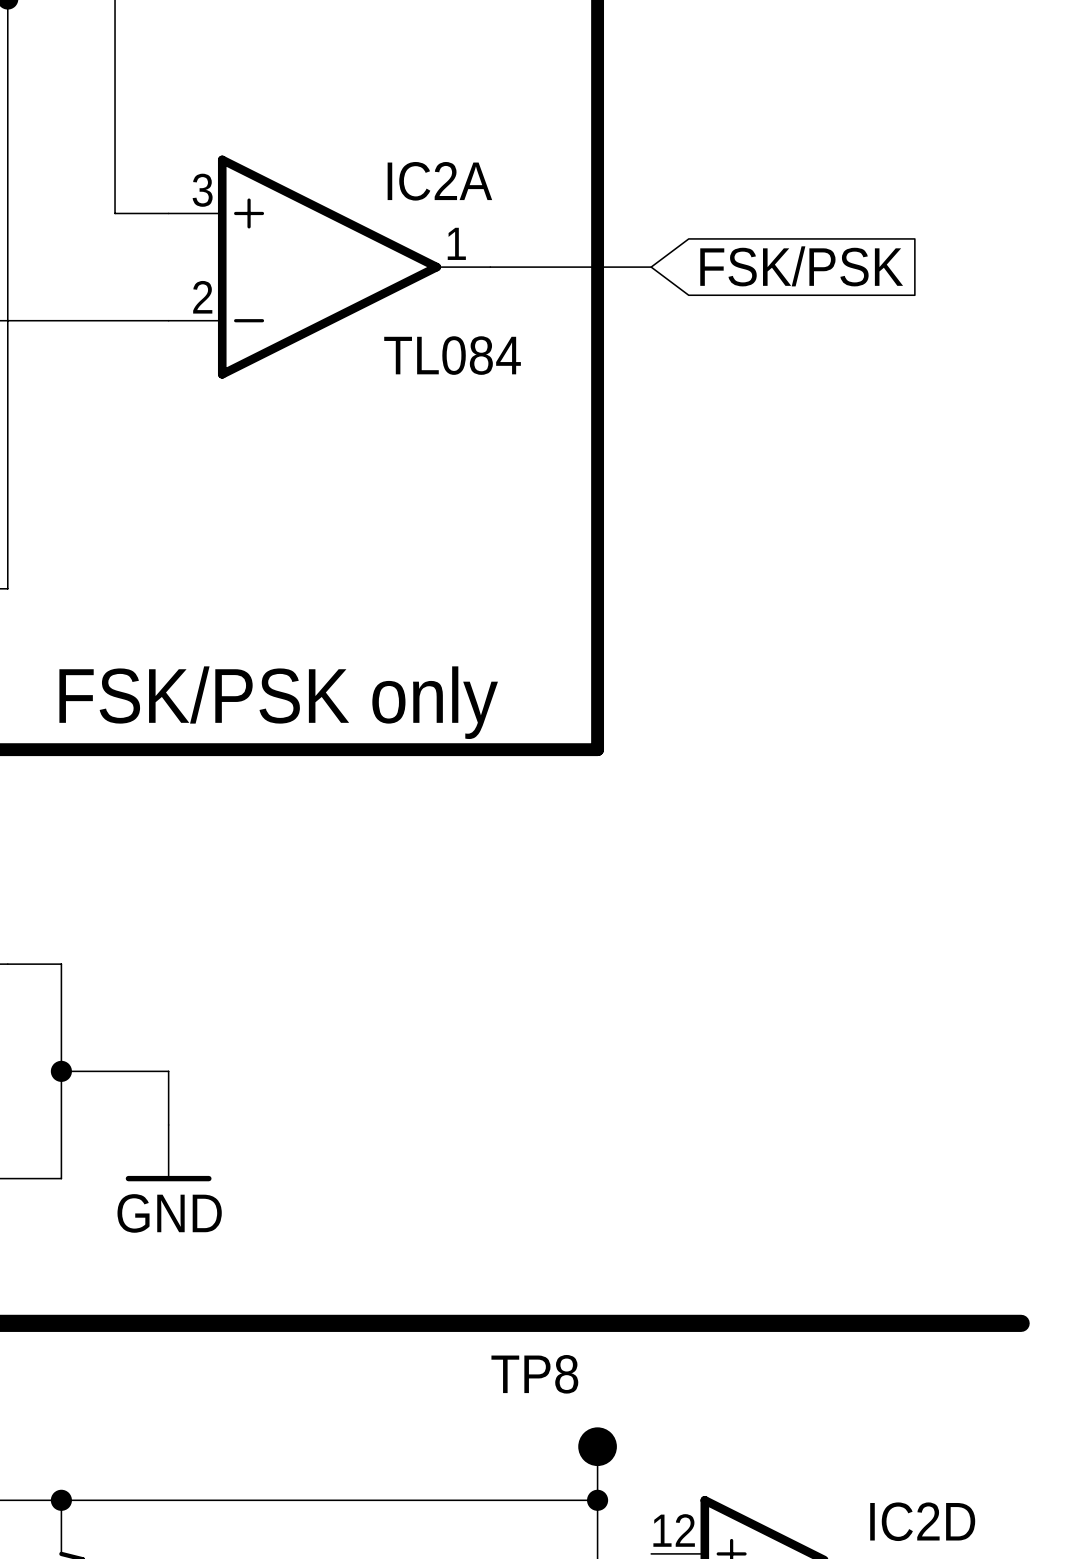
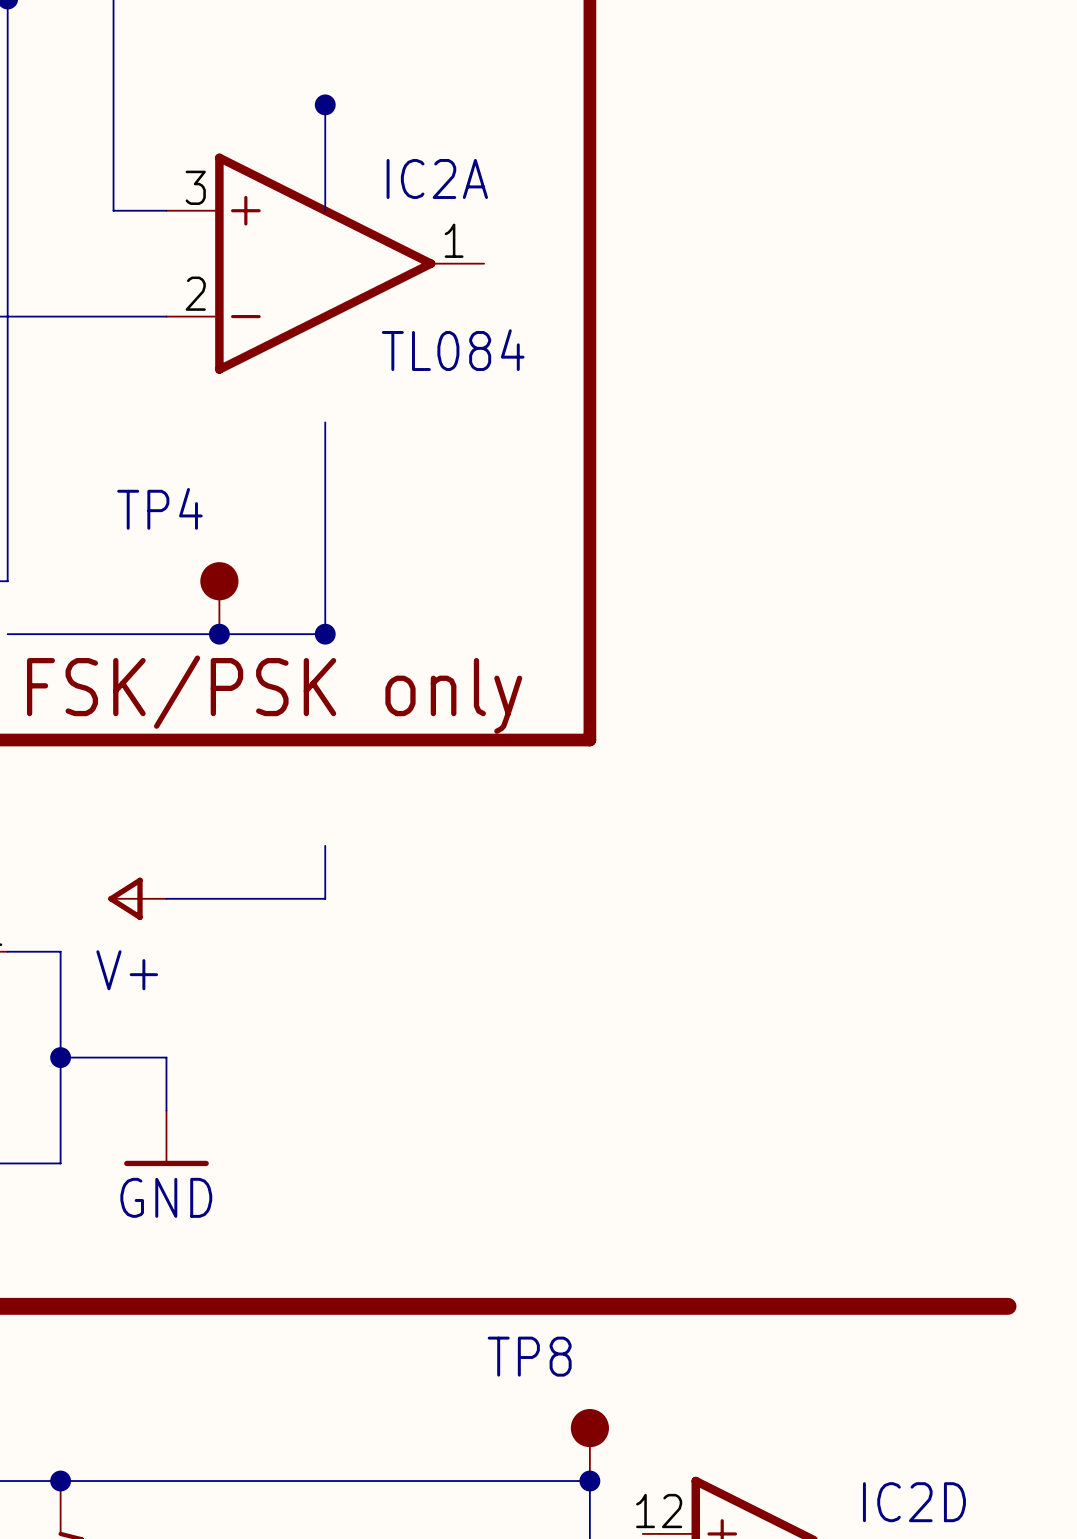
wire: none -> (325, 104) (325, 210)
junction: none -> (325, 104)
global label: FSK/PSK (801, 266) -> none
wire: (490, 267) (651, 267) -> none
wire: none -> (325, 422) (325, 634) (7, 634)
TP4: none -> (219, 598)
junction: none -> (219, 634)
junction: none -> (325, 634)
wire: none -> (325, 845) (325, 898) (166, 898)
power symbol: none -> V+ (137, 898)

